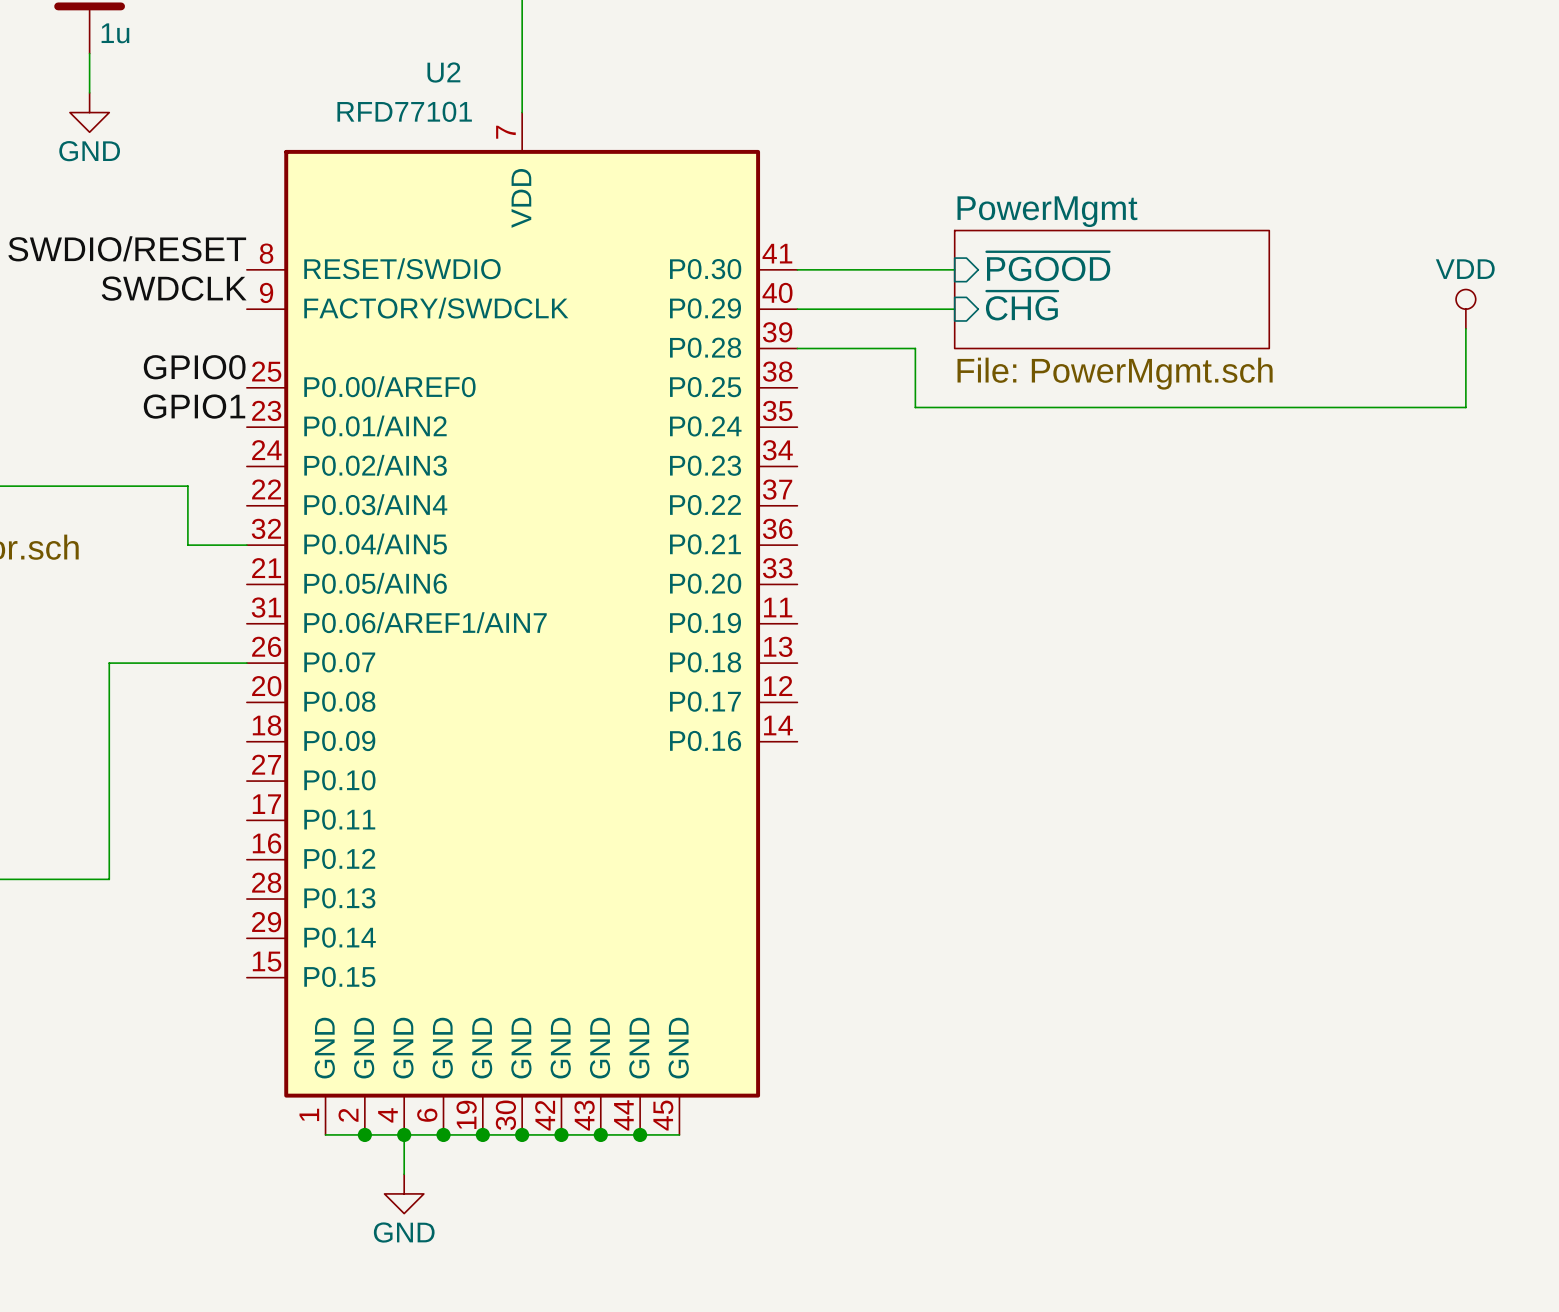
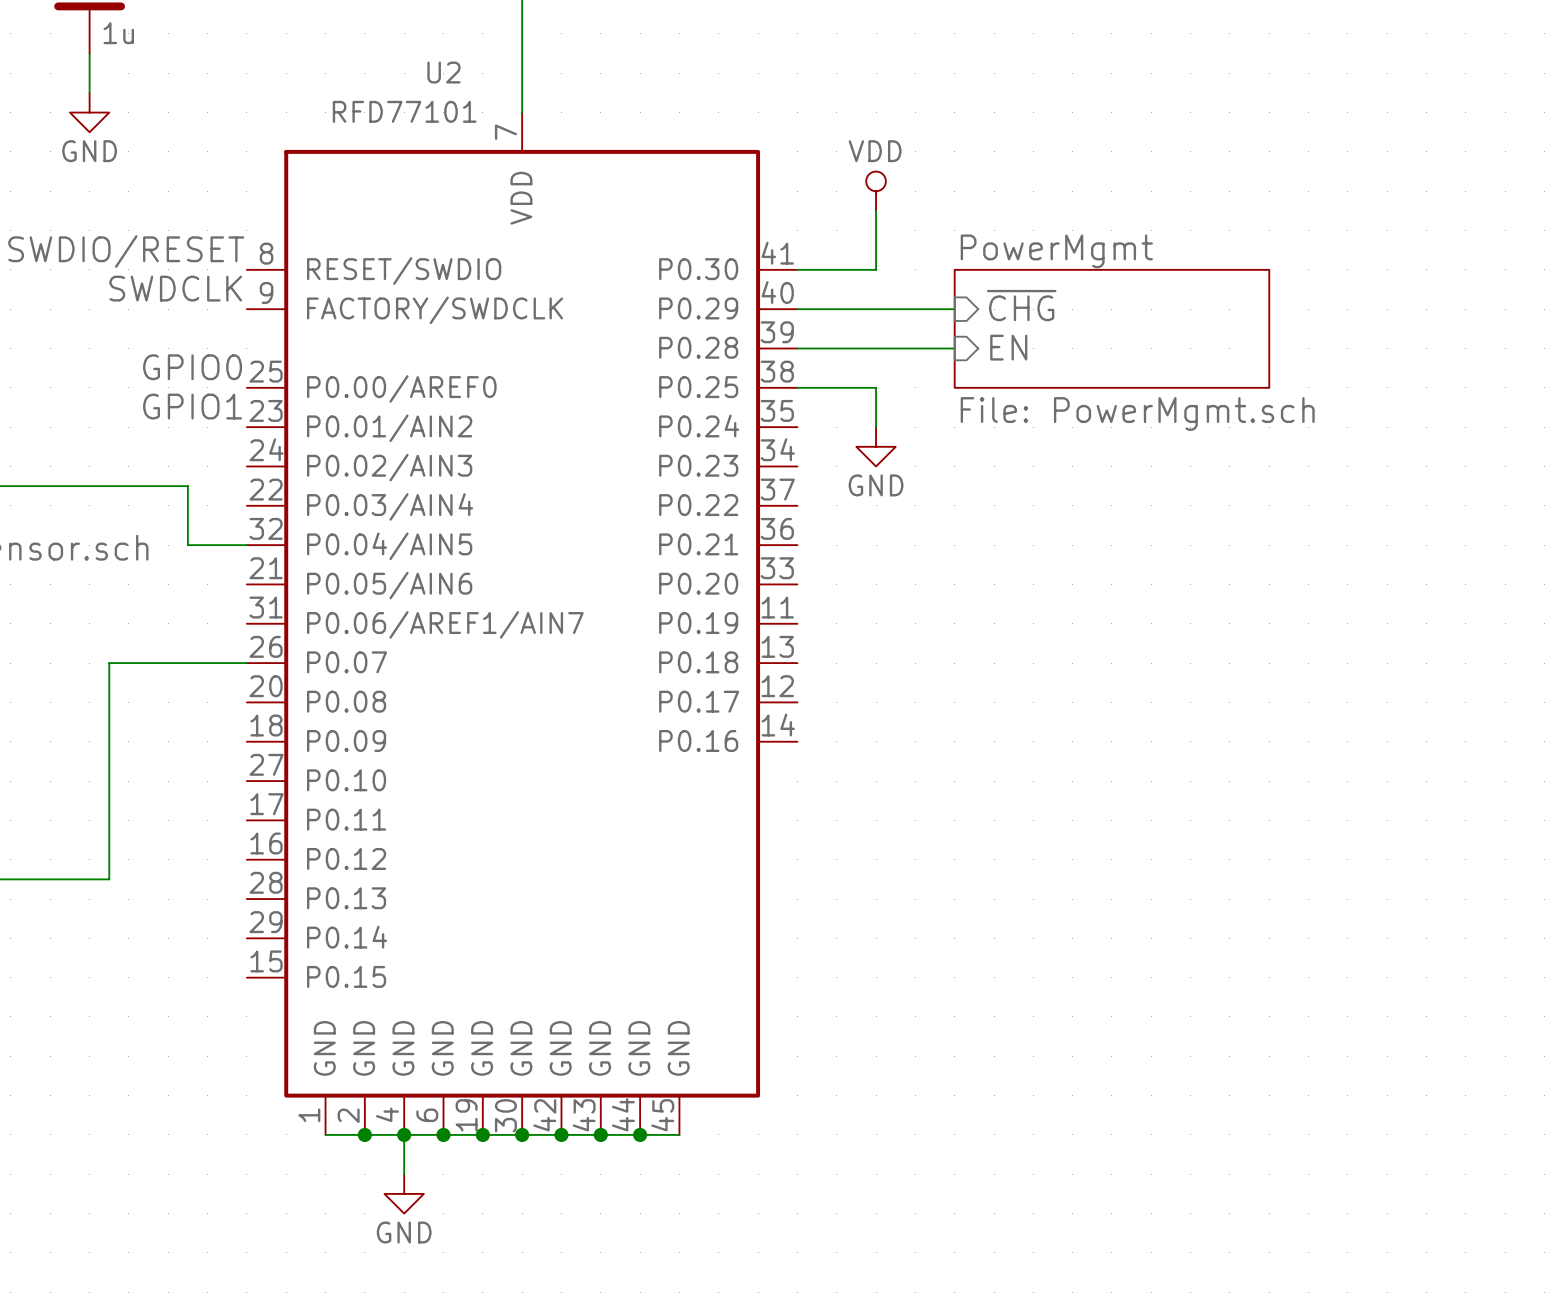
power symbol: none -> VDD (876, 191)
sheet pin: ~{PGOOD} (1048, 266) -> none
wire: (876, 269) (954, 269) -> (876, 269) (876, 210)
sheet PowerMgmt position: (1111, 289) -> (1111, 328)
power symbol: VDD (1465, 309) -> none
wire: (1465, 328) (1465, 407) (915, 407) (915, 348) -> (954, 348) (915, 348)
sheet pin: none -> EN (1008, 347)
wire: none -> (797, 387) (876, 387) (876, 427)
power symbol: none -> GND (876, 446)

